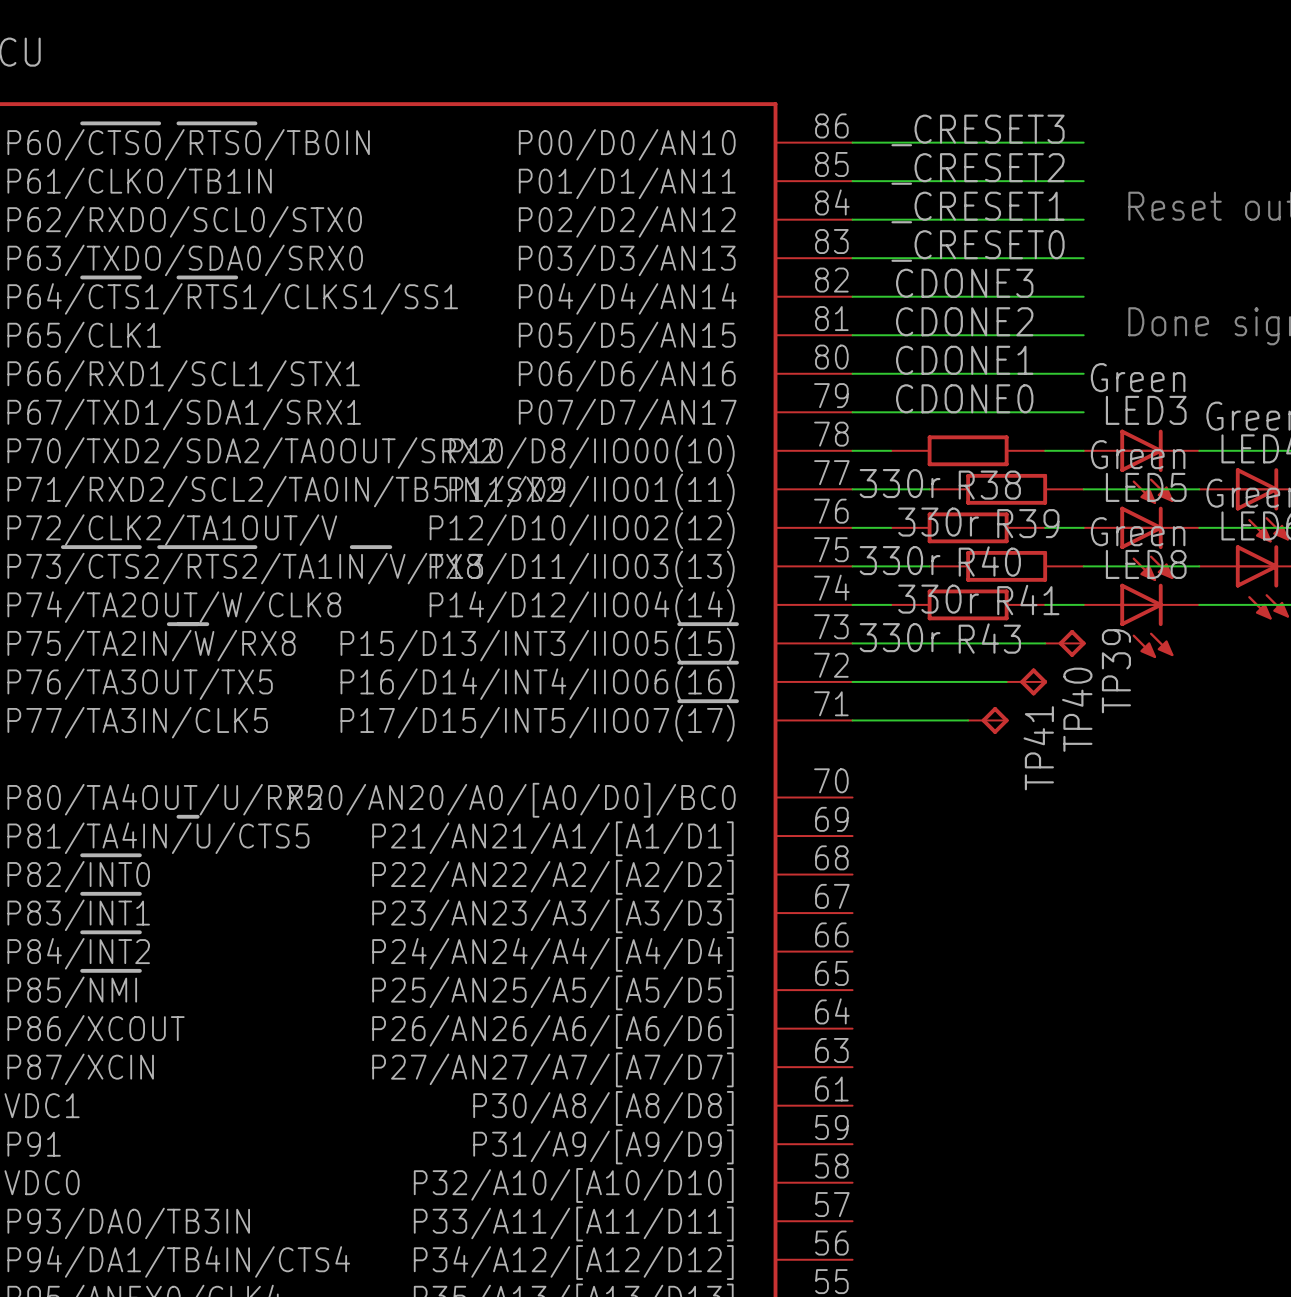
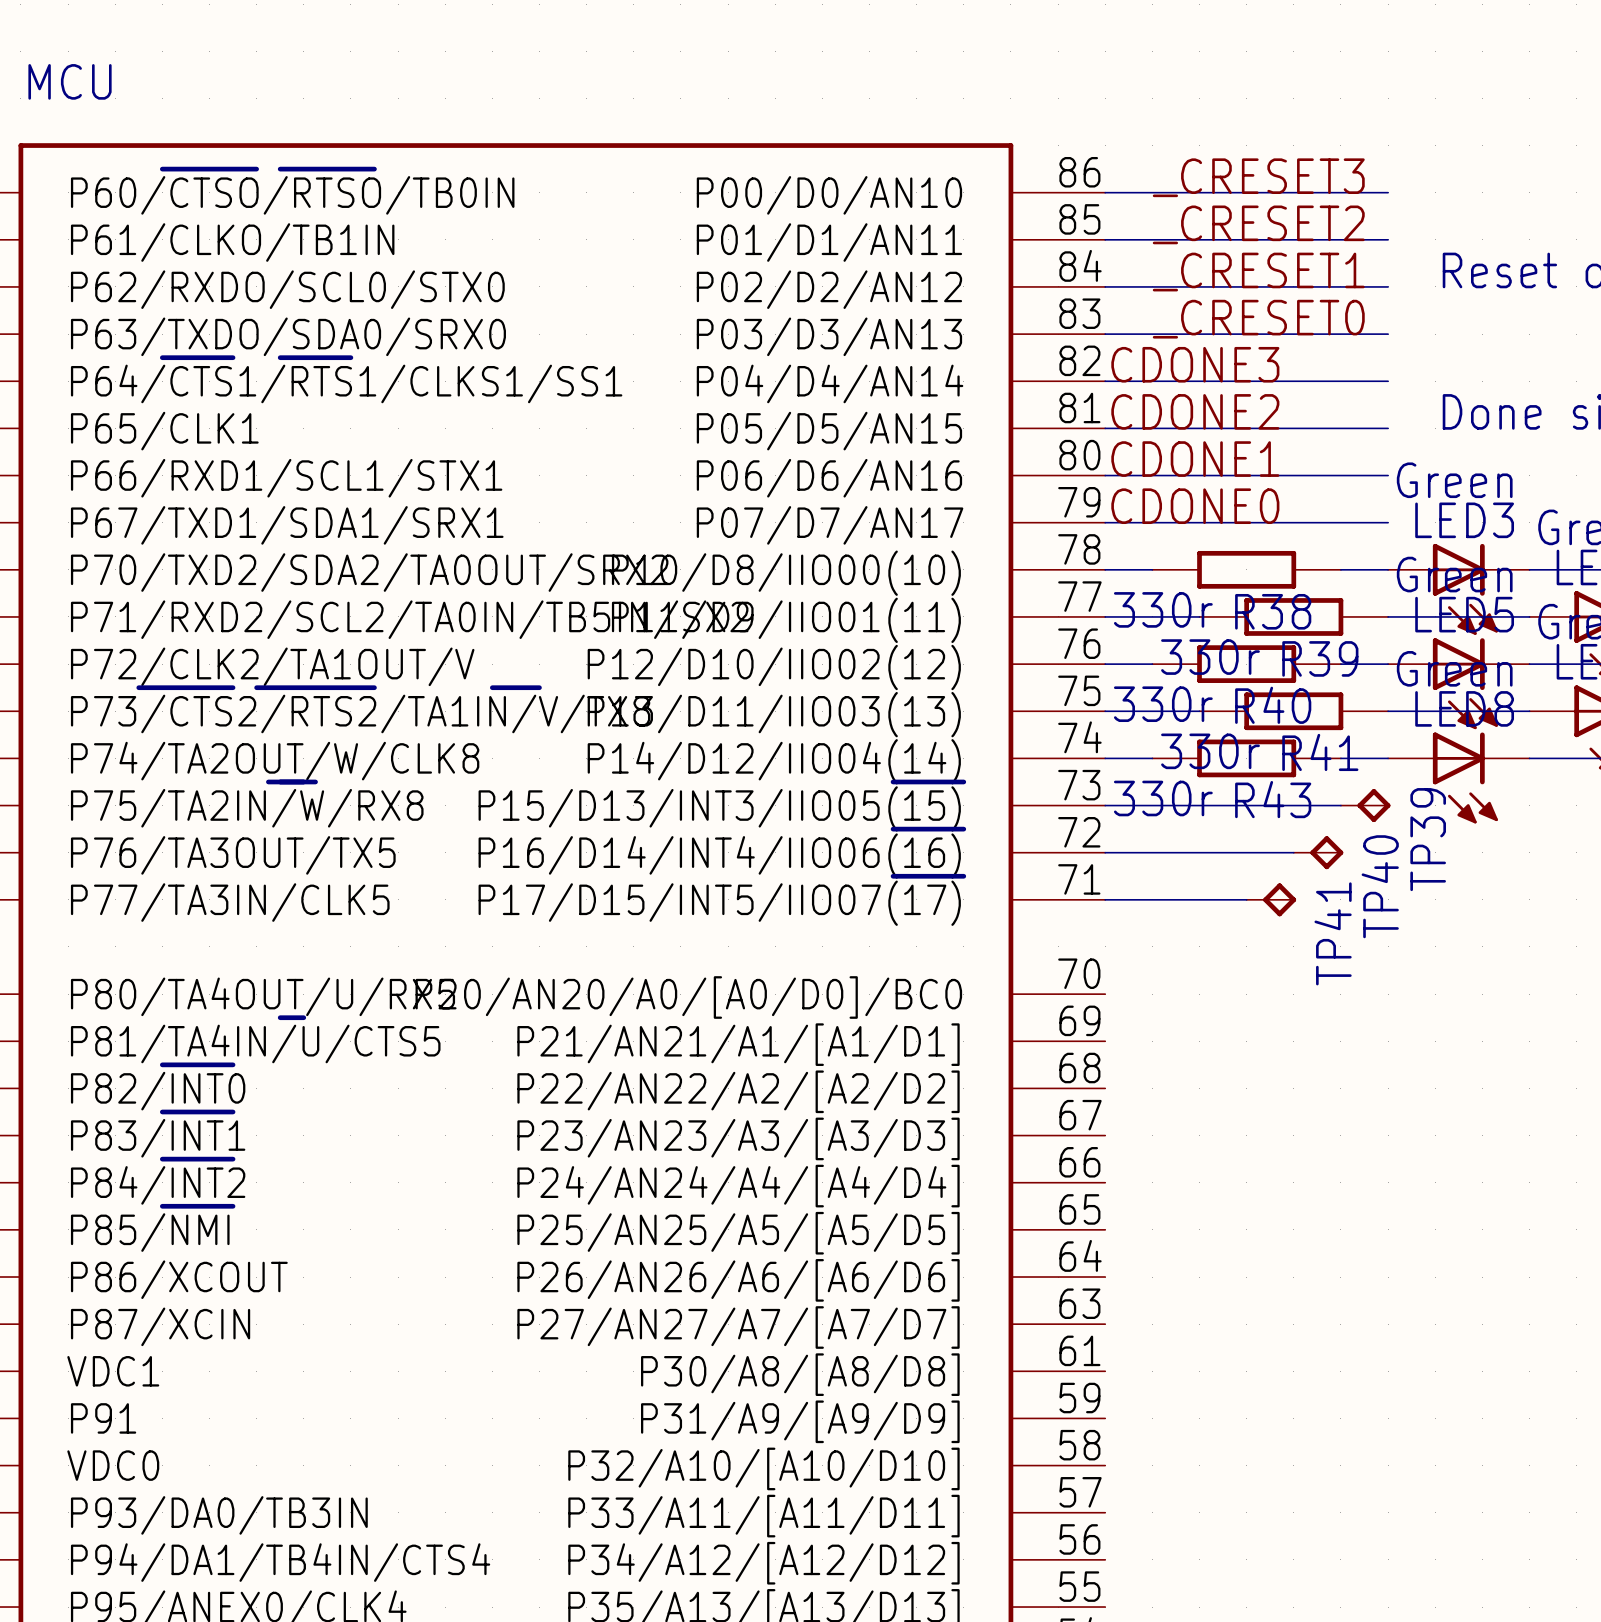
label position: CDONE3 (964, 283) -> CDONE3 (1195, 364)
label position: CDONE2 (964, 321) -> CDONE2 (1195, 411)
label position: CDONE1 (964, 360) -> CDONE1 (1195, 459)
label position: CDONE0 (964, 398) -> CDONE0 (1195, 506)

